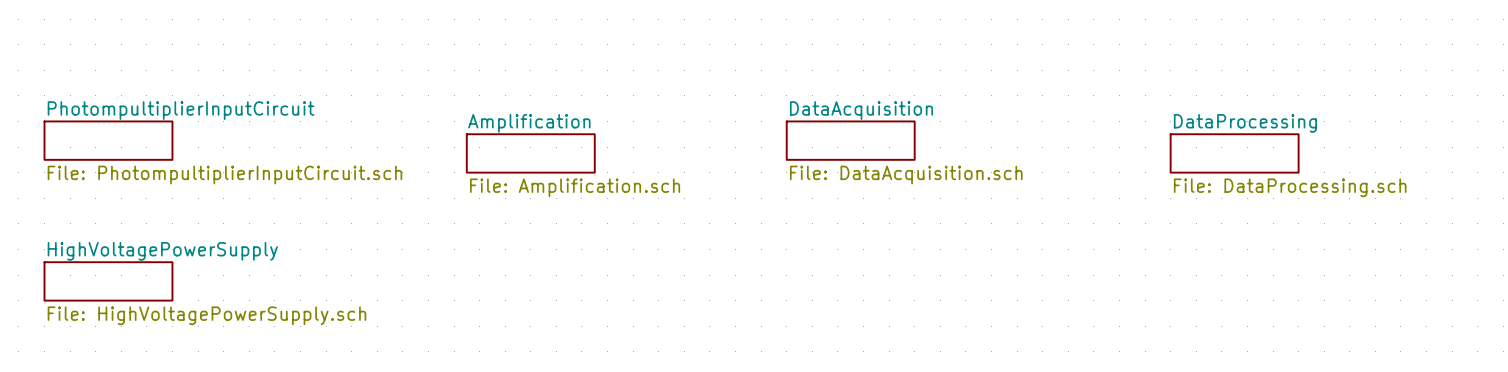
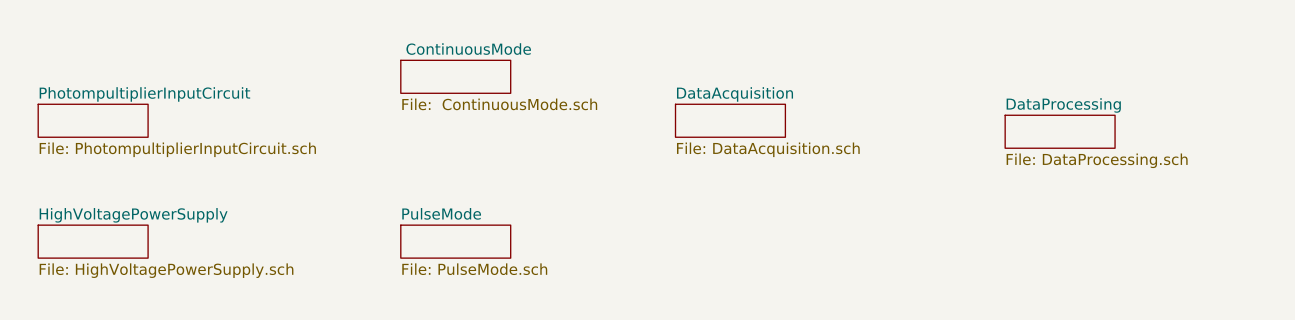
sheet ContinuousMode: none -> File: ContinuousMode.sch (455, 76)
sheet Amplification: File: Amplification.sch (530, 153) -> none
sheet PulseMode: none -> File: PulseMode.sch (455, 241)

